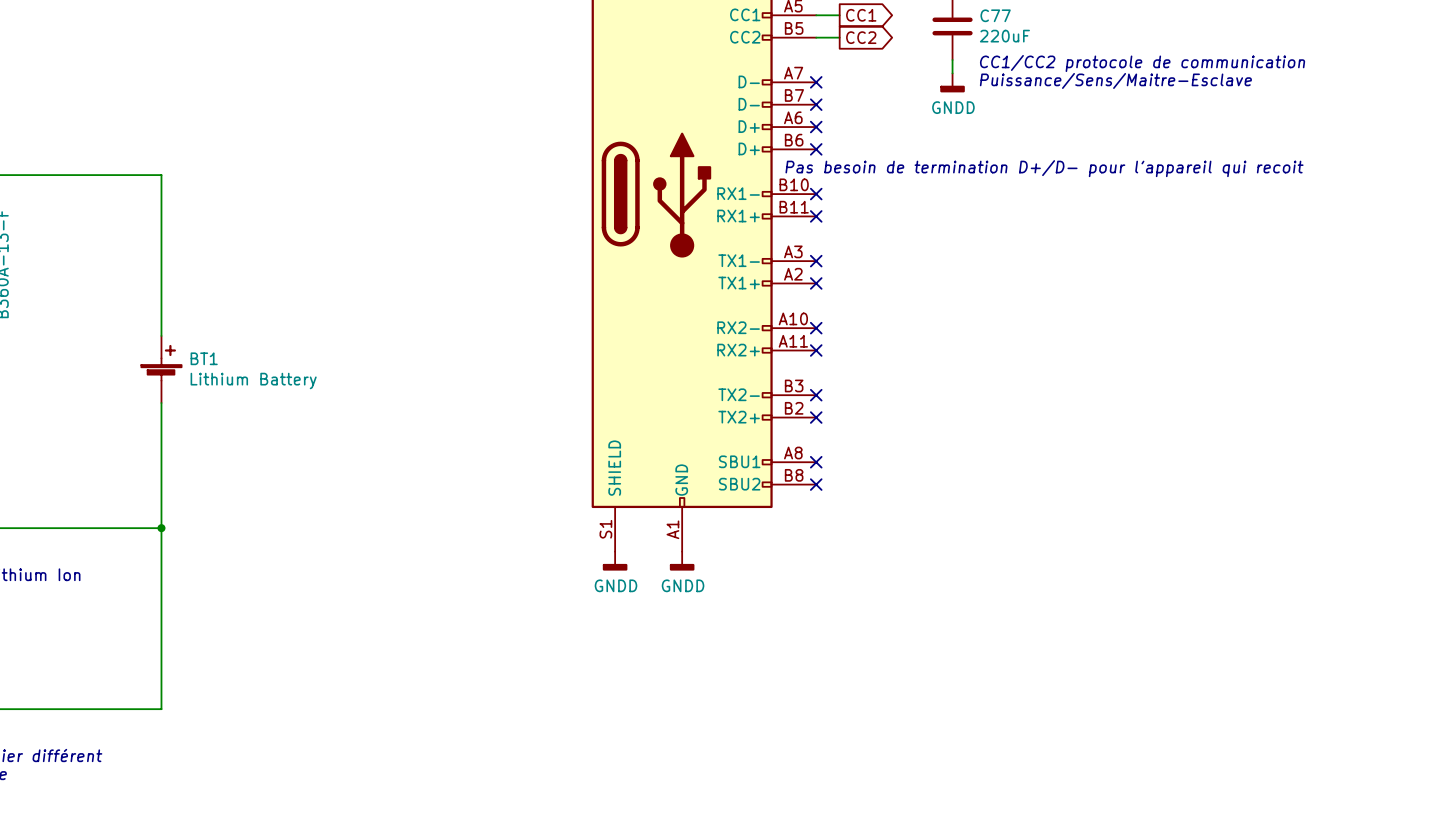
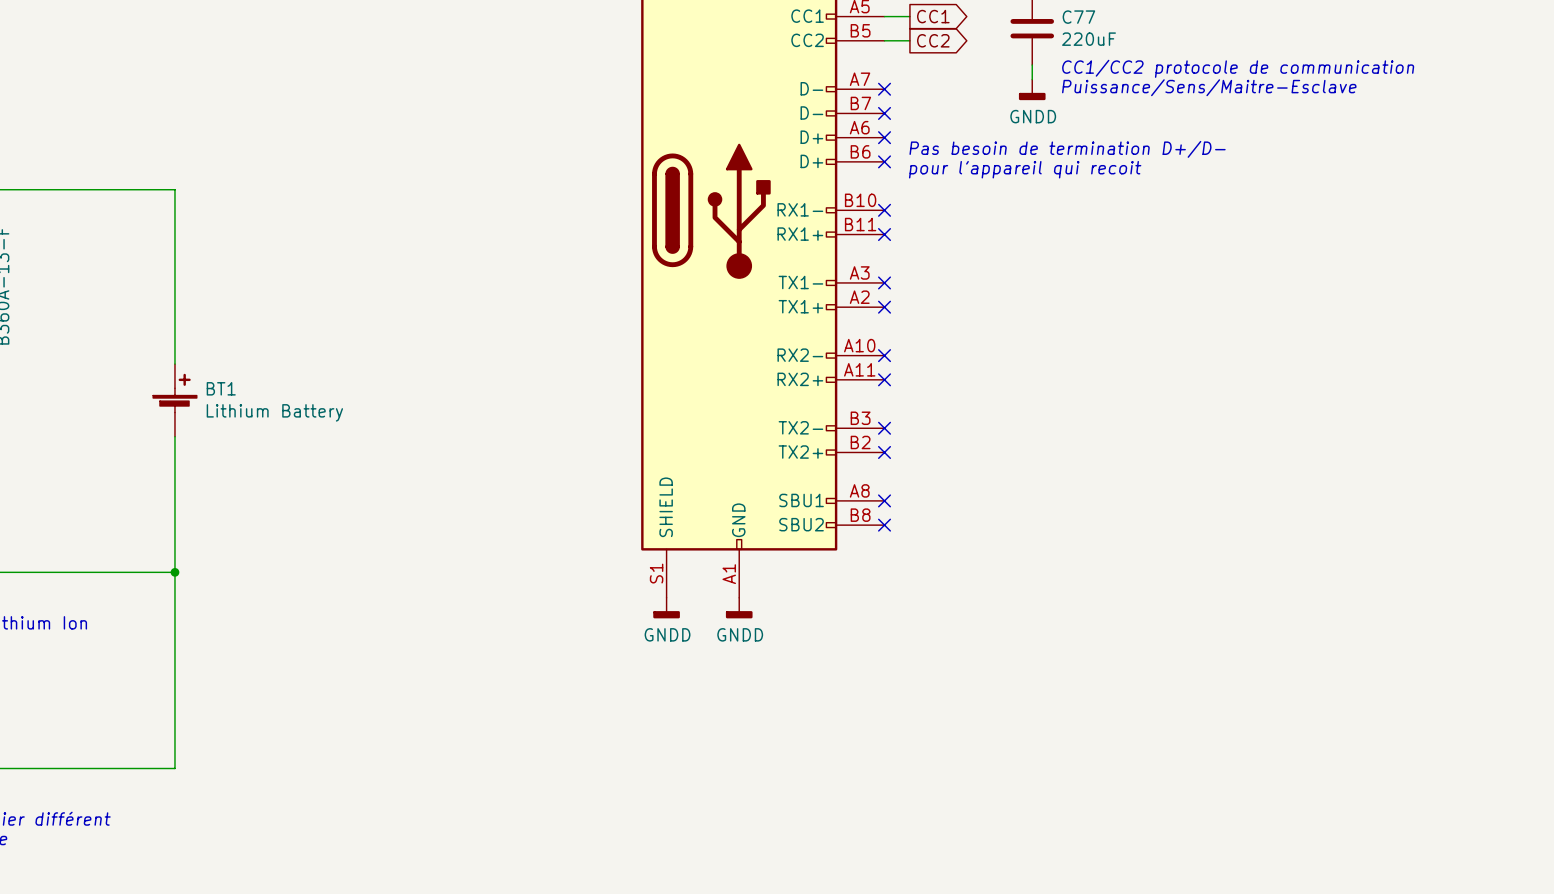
text: none -> Pas besoin de termination D+/D- (1067, 149)
text: Pas besoin de termination D+/D- pour l'appareil qui recoit (1044, 168) -> pour l'appareil qui recoit (1025, 169)

